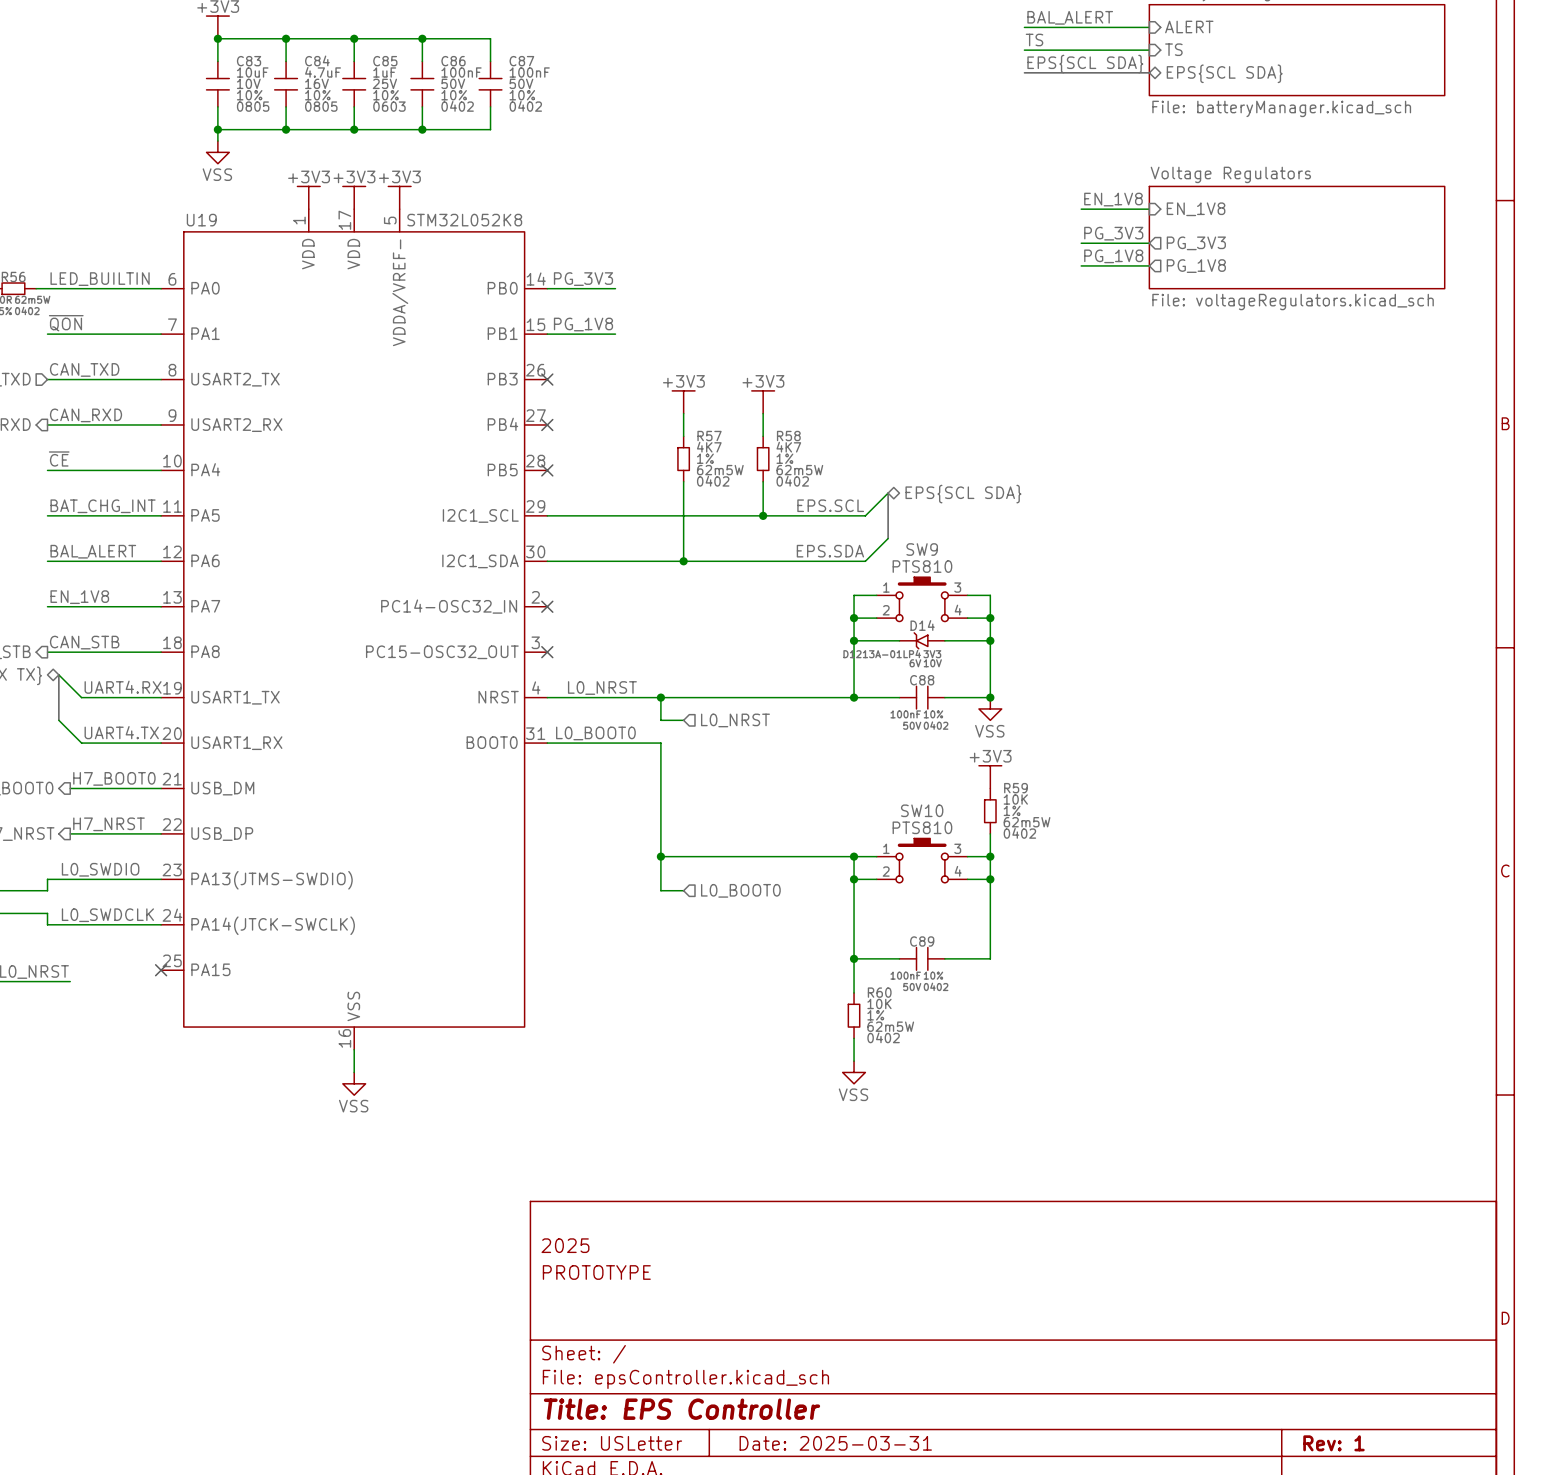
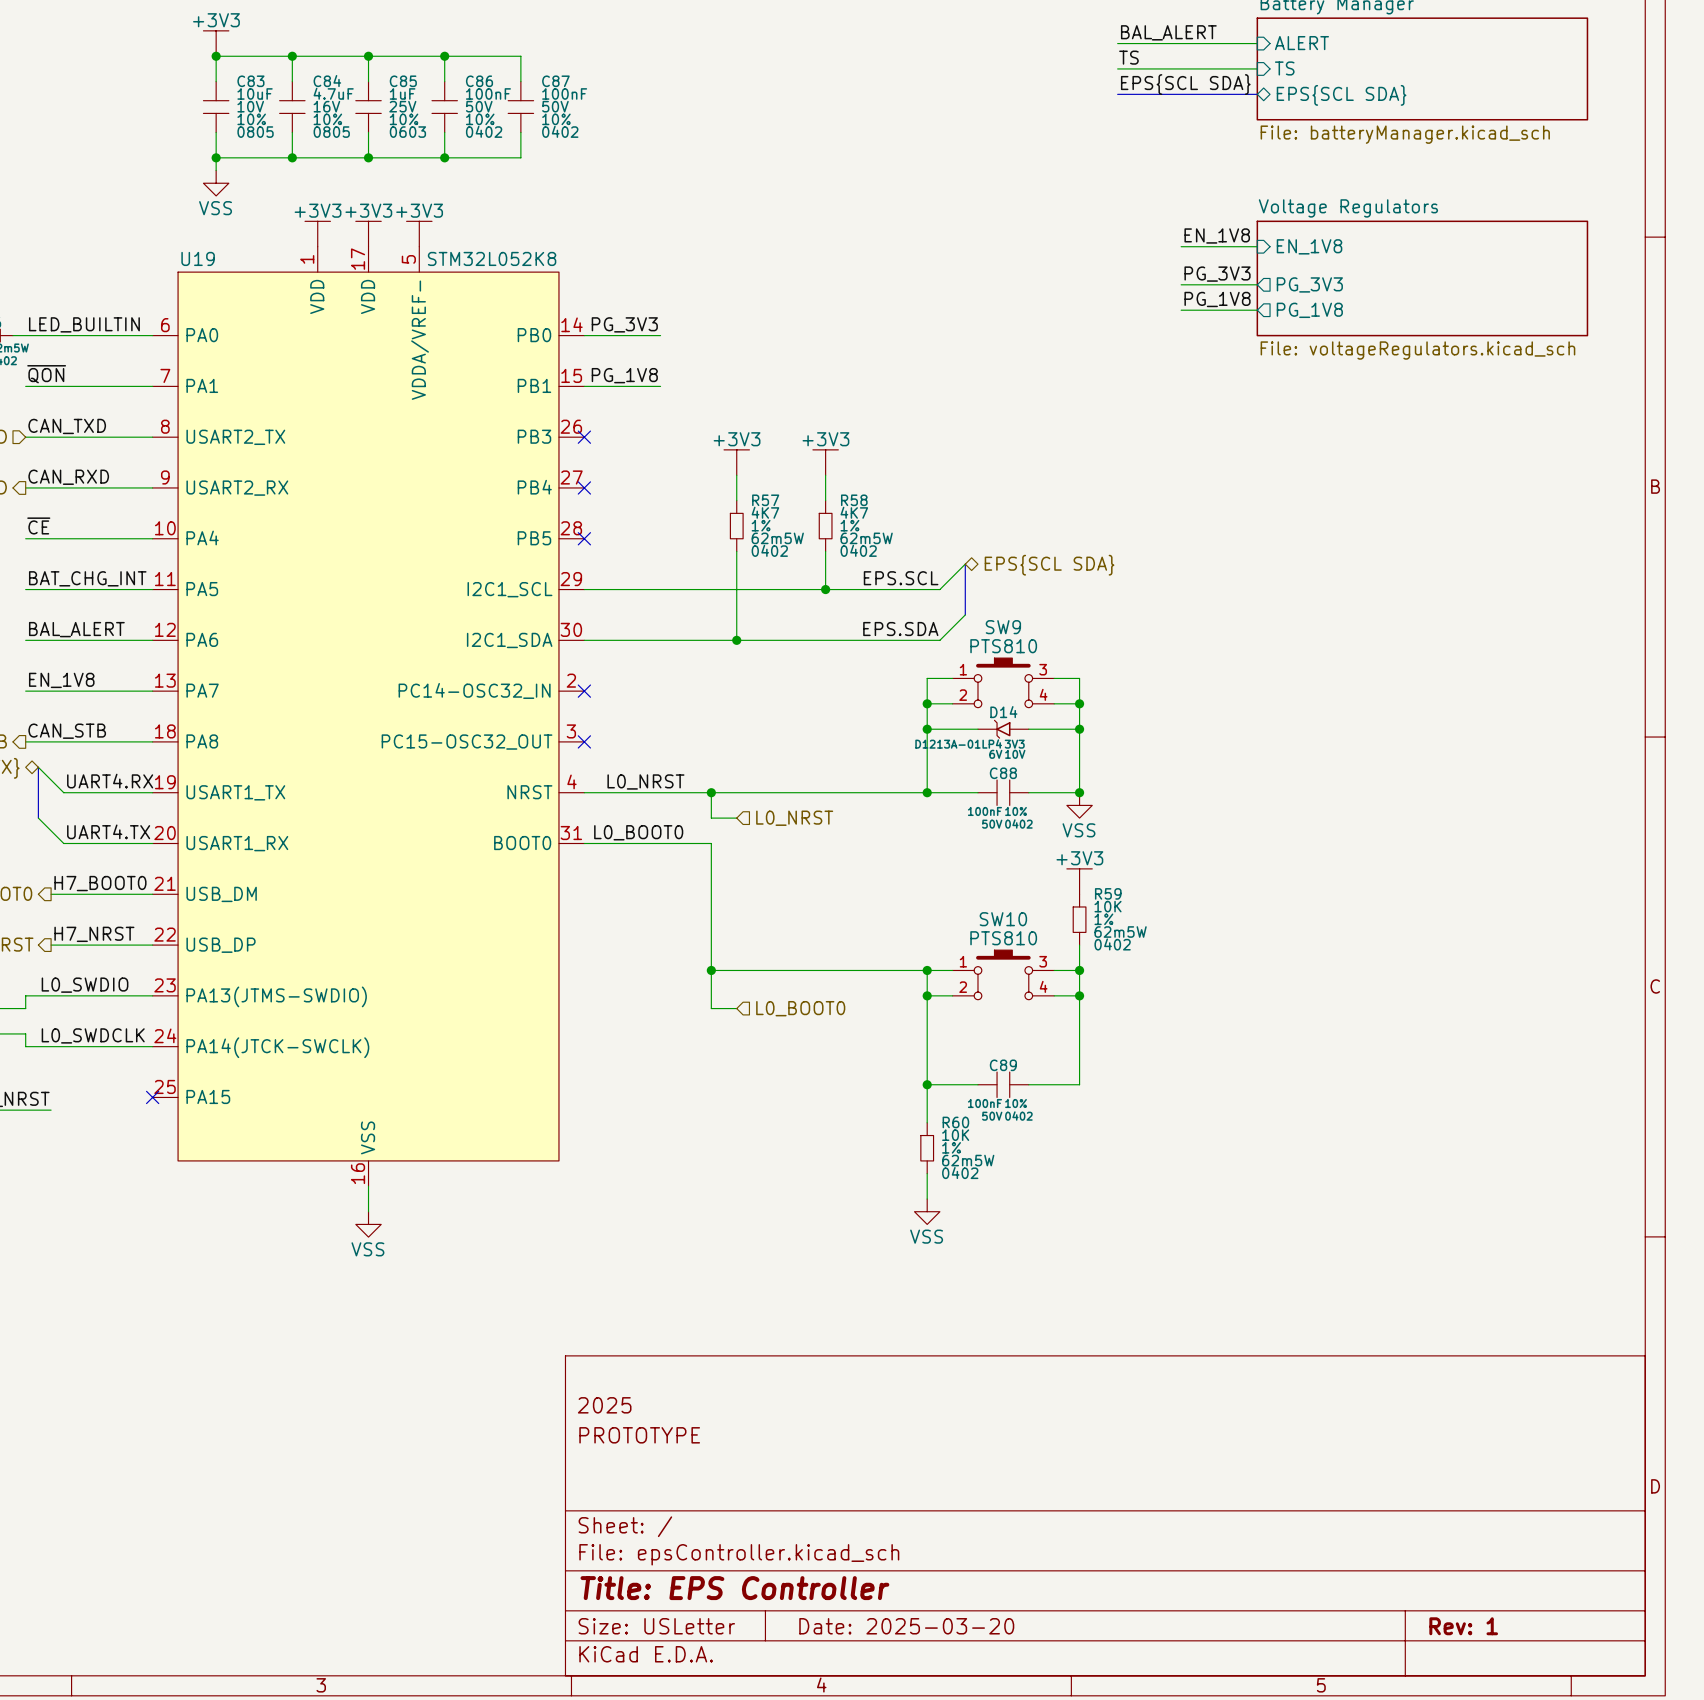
title block: Date: 2025-03-31 (835, 1443) -> Date: 2025-03-20 (906, 1626)

